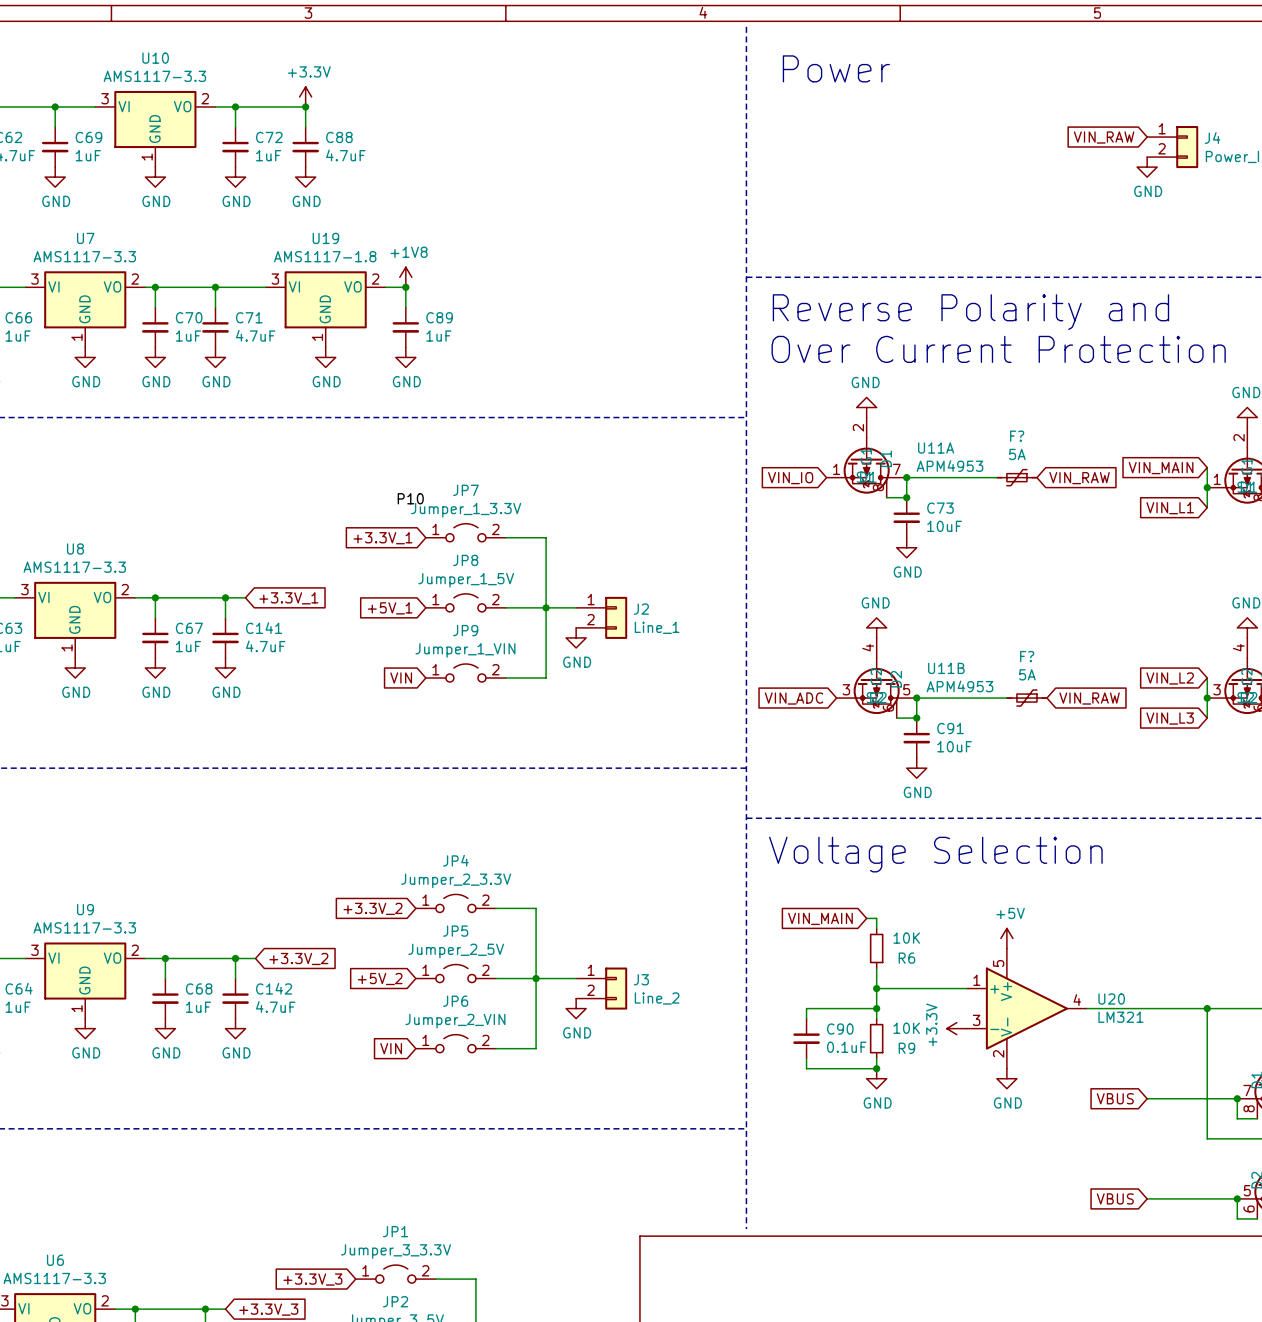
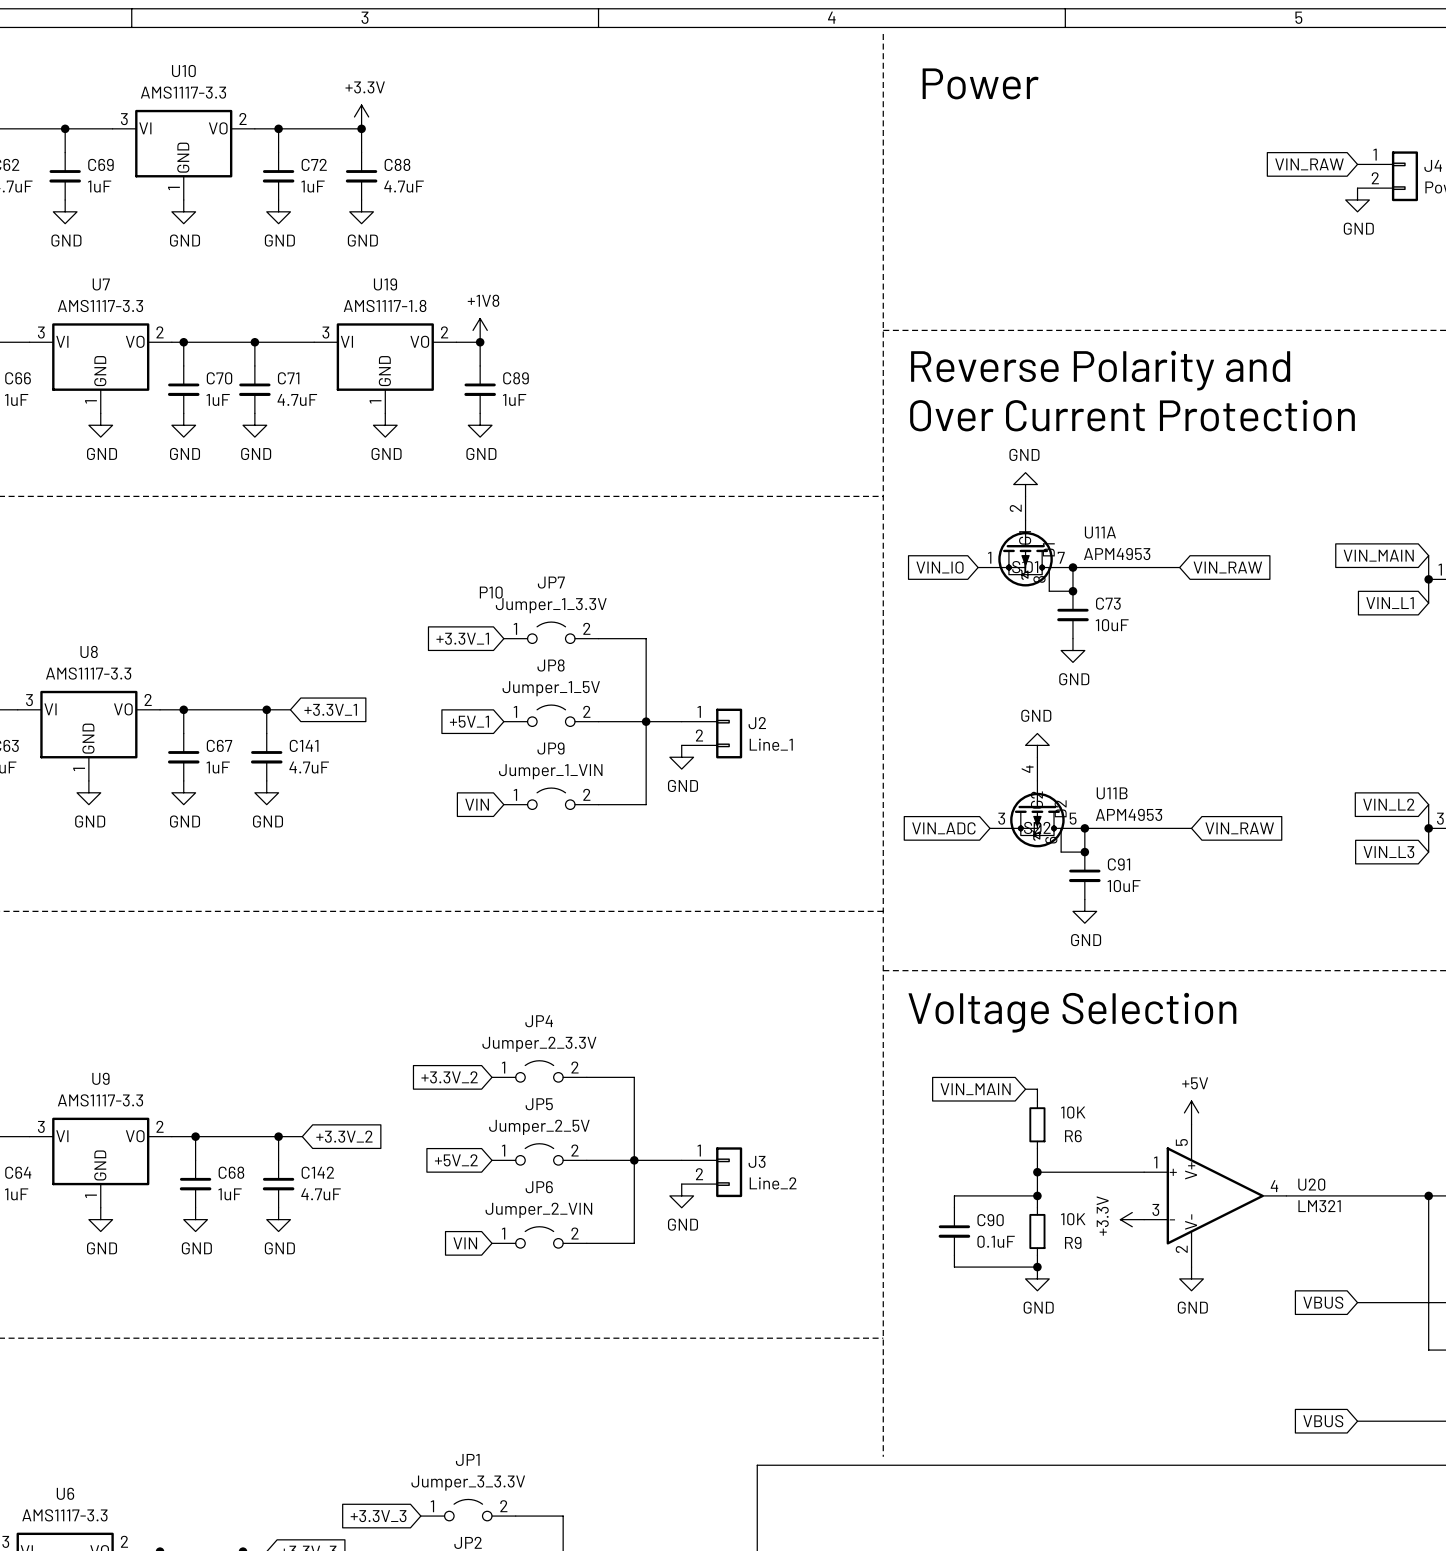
F?: 5A (1016, 477) -> none
global label position: VIN_RAW (1079, 478) -> VIN_RAW (1227, 567)
F?: 5A (1026, 698) -> none
global label position: VIN_RAW (1089, 698) -> VIN_RAW (1239, 828)

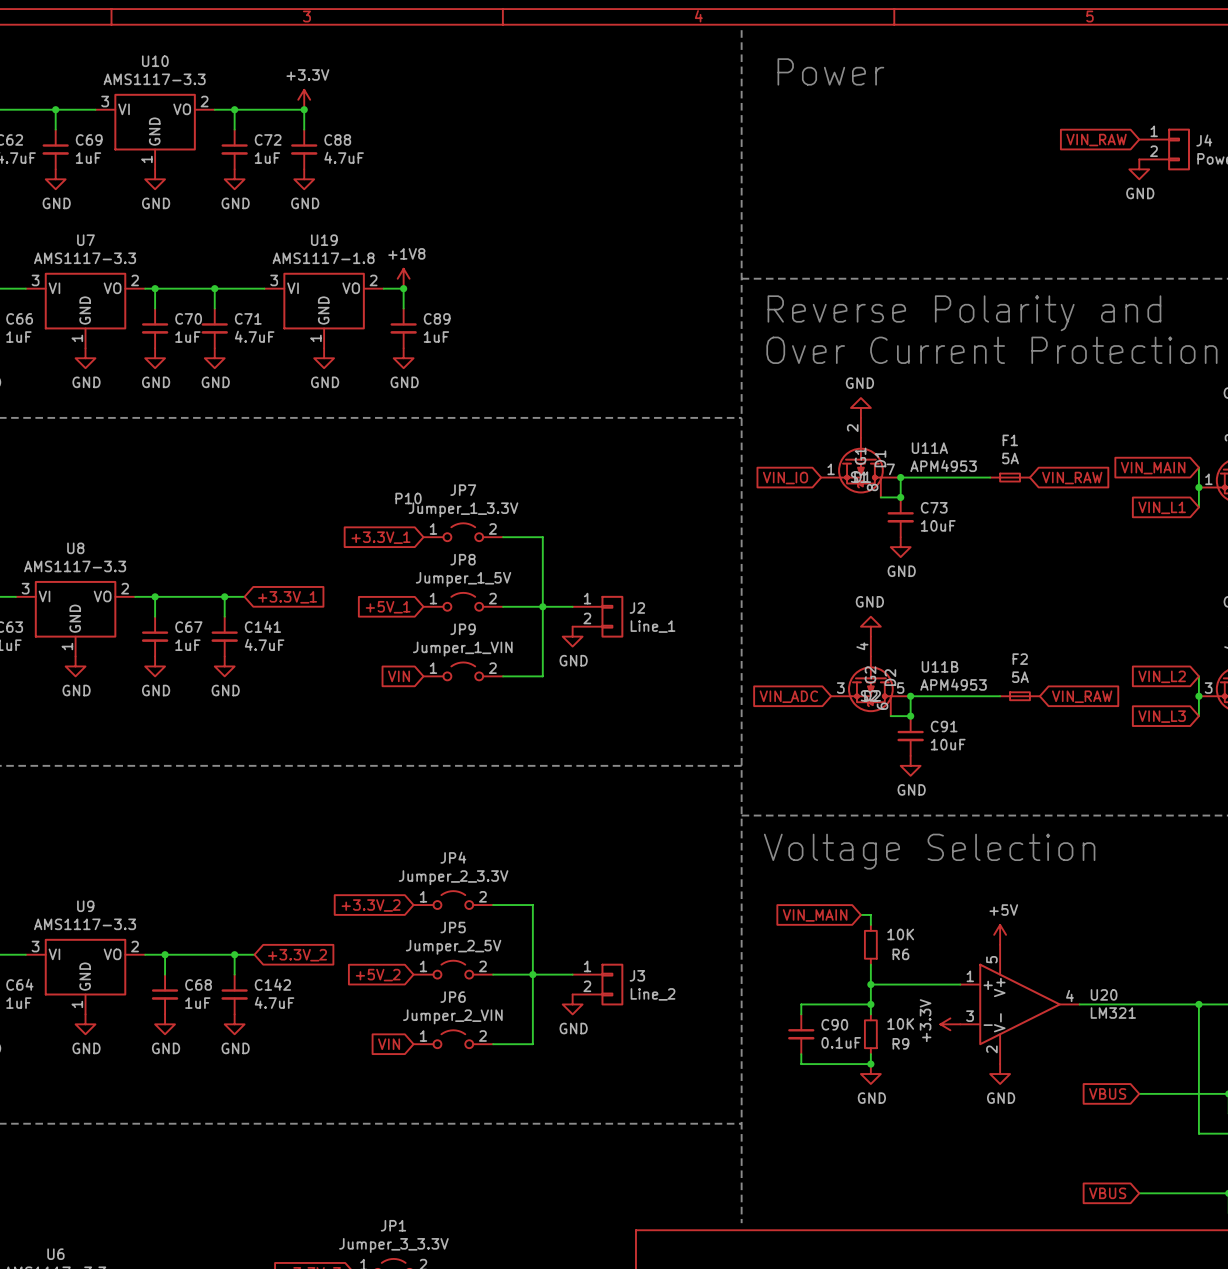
F1: none -> 5A (1010, 477)
global label position: VIN_RAW (1227, 567) -> VIN_RAW (1072, 478)
F2: none -> 5A (1019, 696)
global label position: VIN_RAW (1239, 828) -> VIN_RAW (1082, 696)

